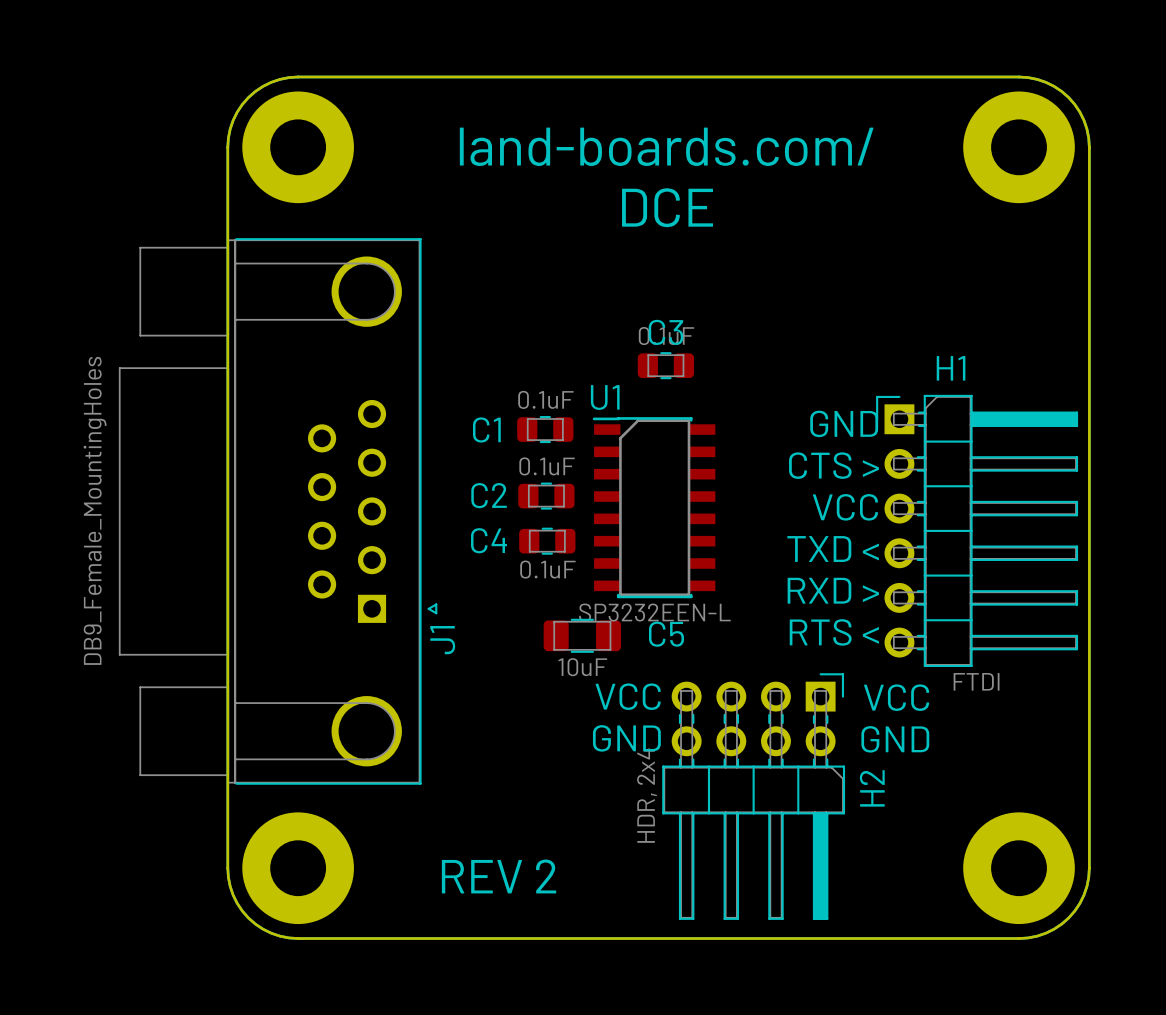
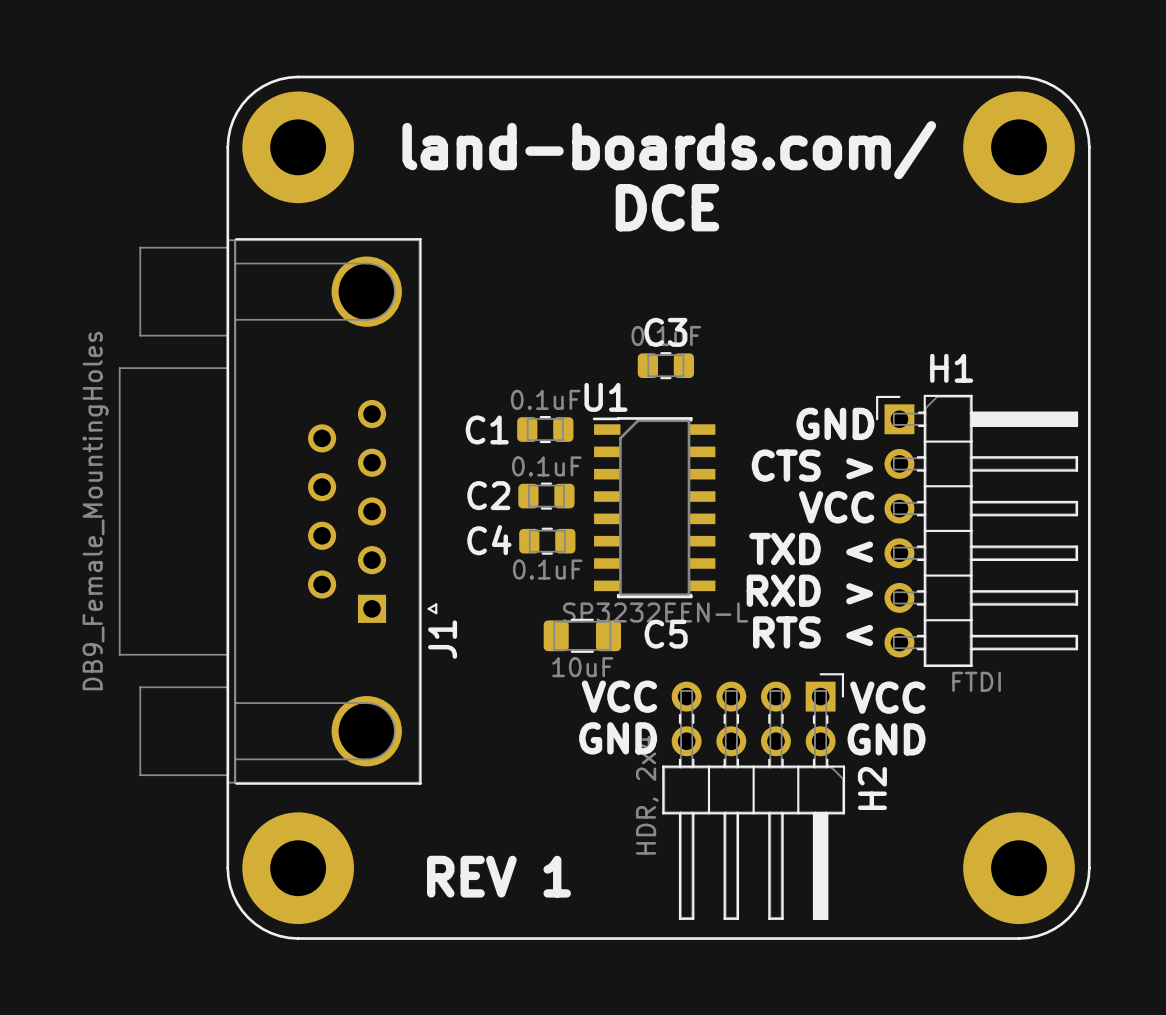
board edge: (298, 76) (1019, 76) (1045, 82) (1068, 97) (1083, 120) (1089, 147) (1089, 868) (1083, 895) (1068, 917) (1045, 933) (1019, 938) (298, 938) (271, 933) (248, 917) (233, 895) (227, 868) (227, 147) (233, 120) (248, 97) (271, 82) (298, 76) -> none
text: REV 2 (499, 876) -> REV 1 (498, 876)

